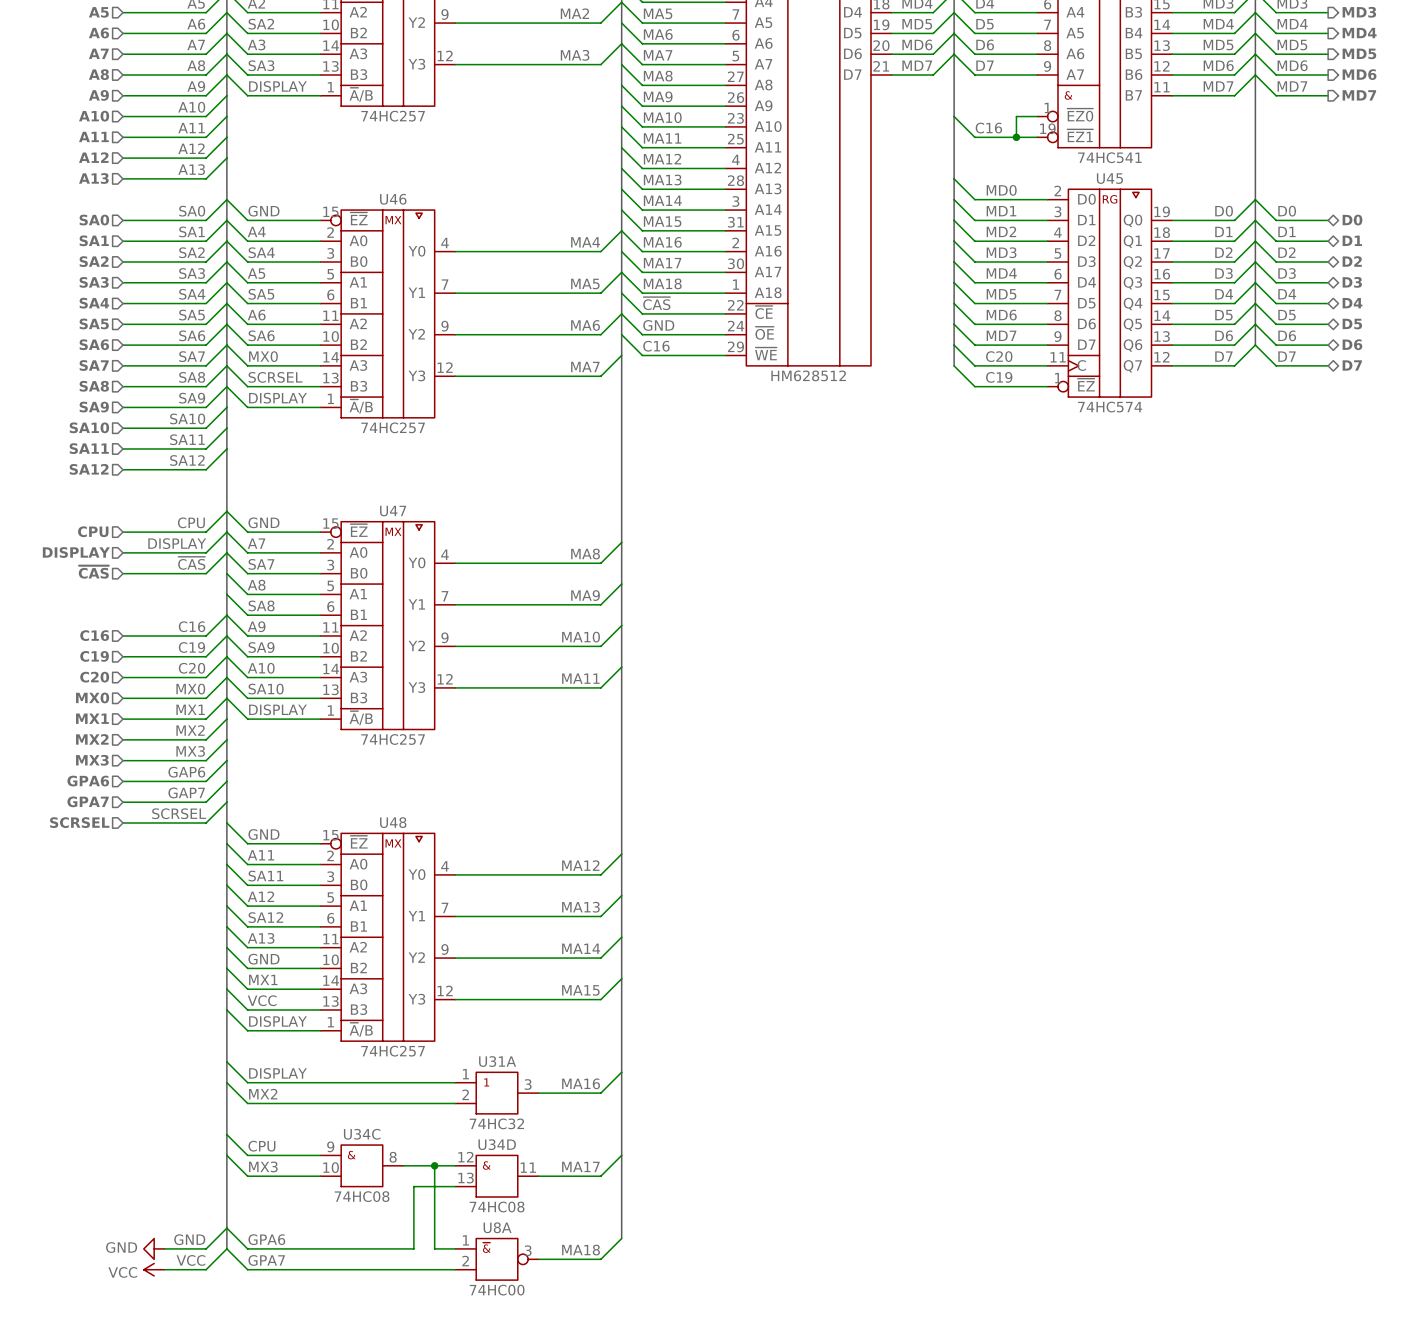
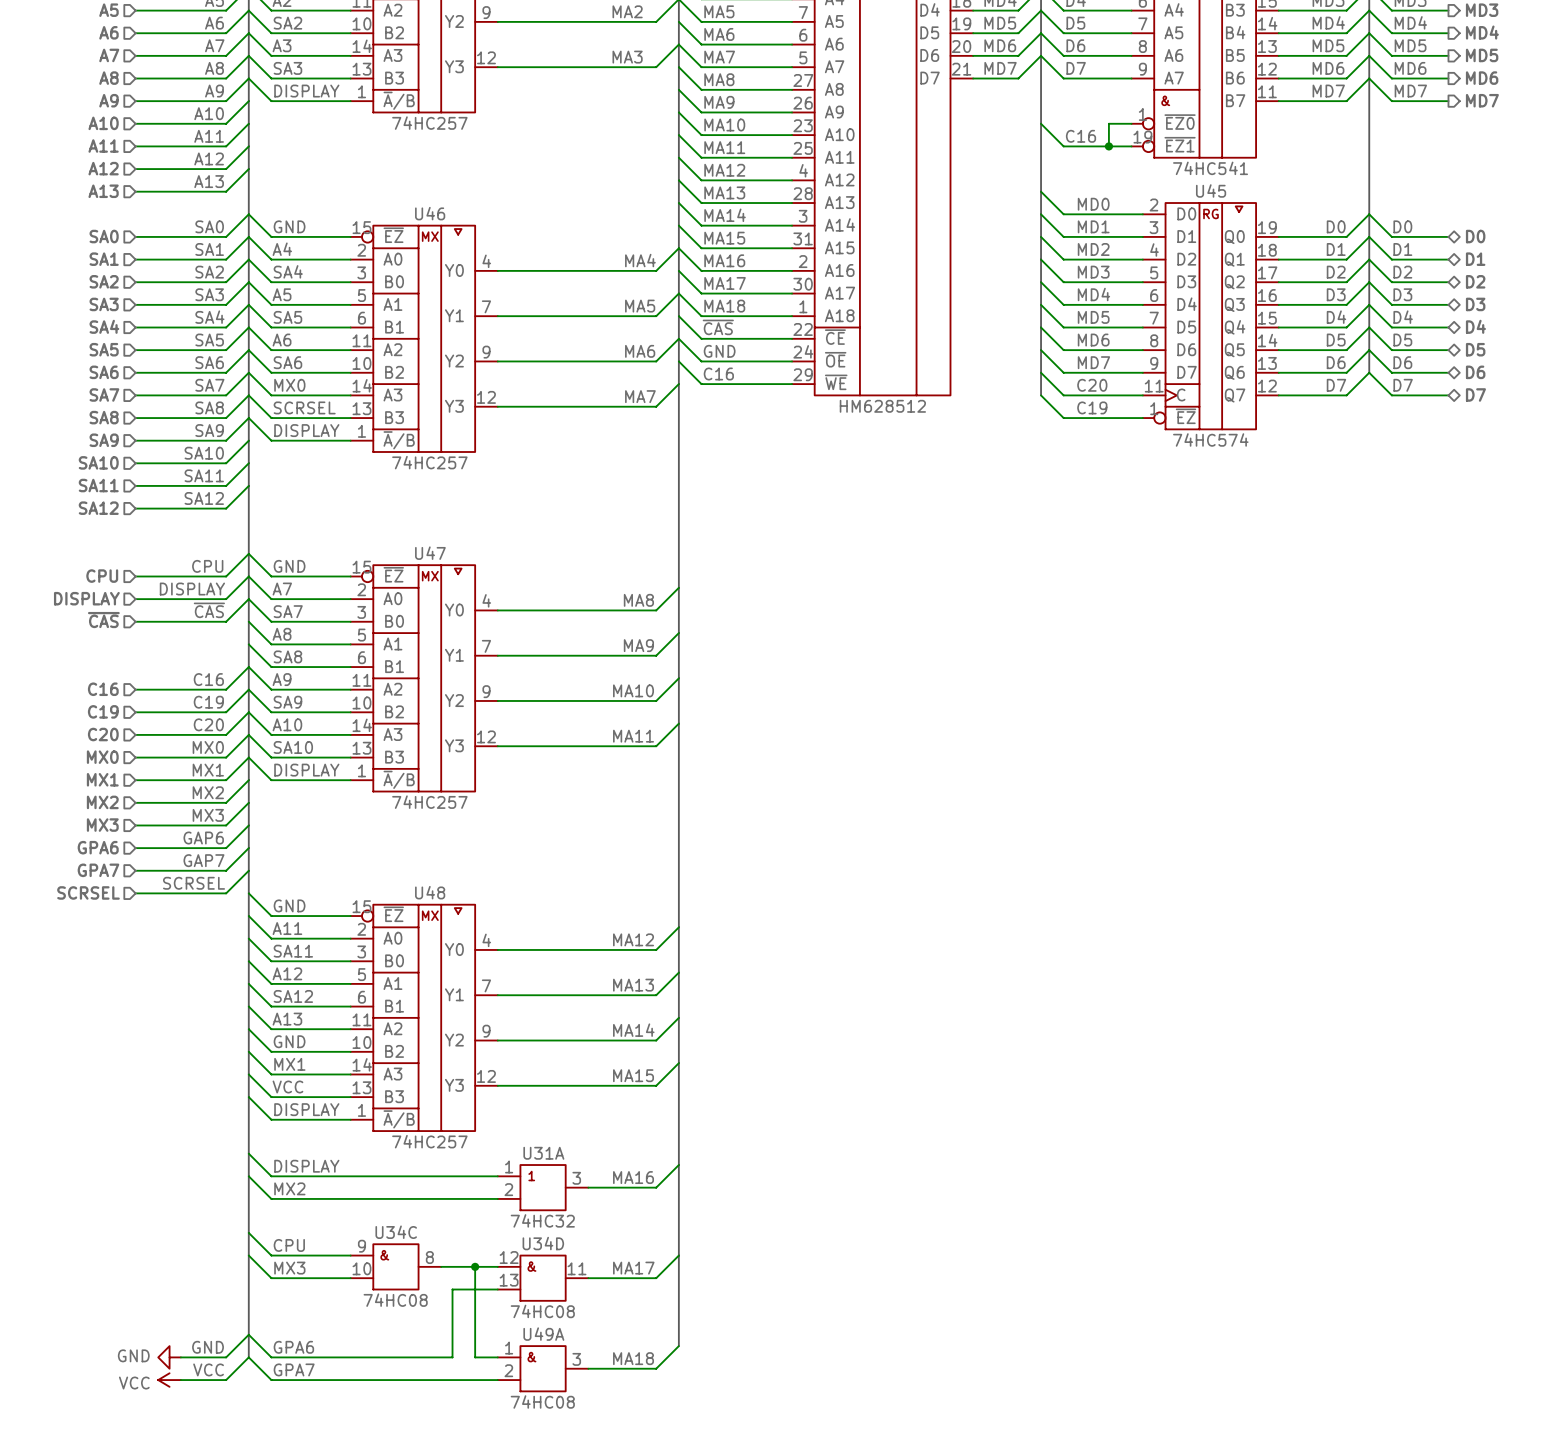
U8A: 74HC00 (497, 1259) -> none
U49A: none -> 74HC08 (543, 1368)

